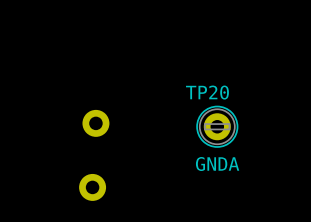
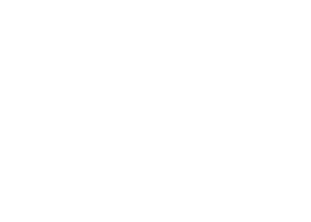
part: (95, 123) -> none
TP20: GNDA (217, 126) -> none
part: (92, 187) -> none

